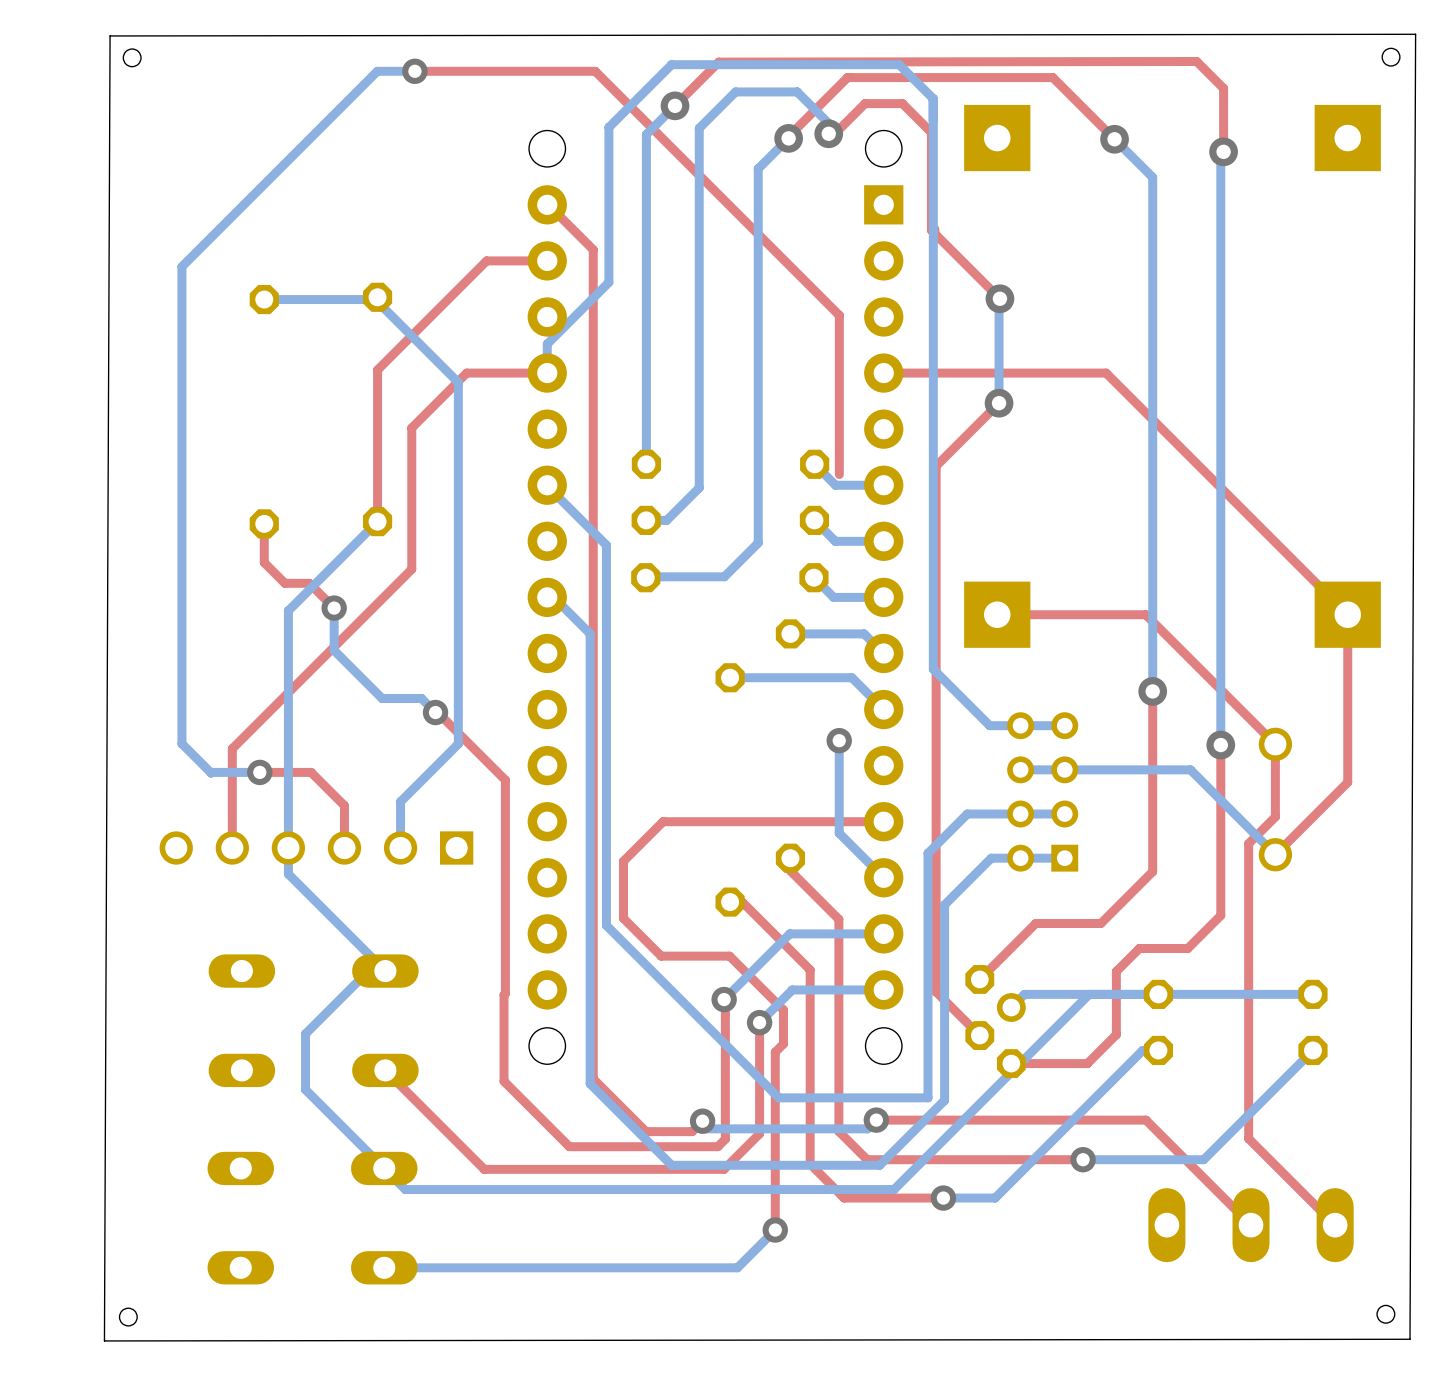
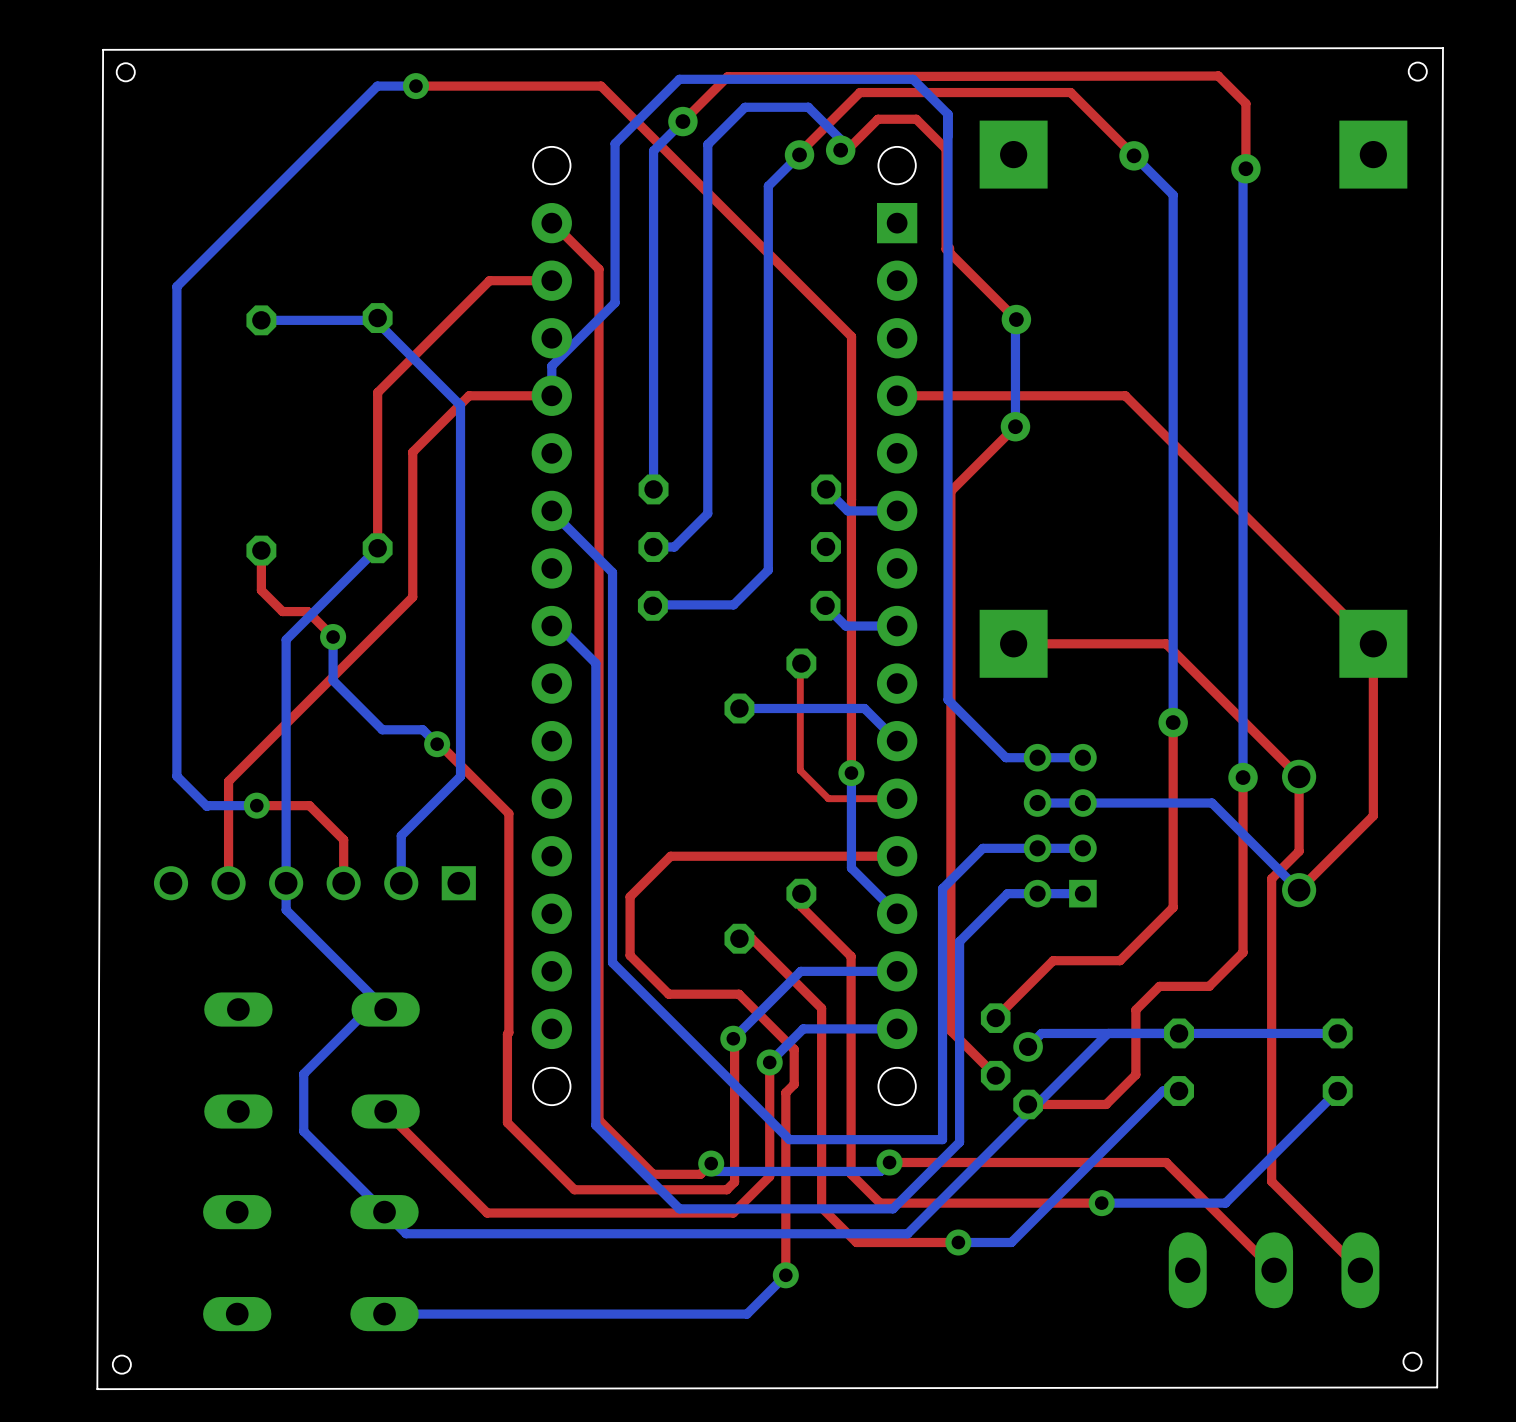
top track: none -> (851, 500) (851, 773)
bottom track: (814, 520) (835, 541) (883, 541) -> none
bottom track: (790, 633) (864, 633) (883, 653) -> none
top track: none -> (801, 663) (800, 770) (828, 798) (897, 798)

